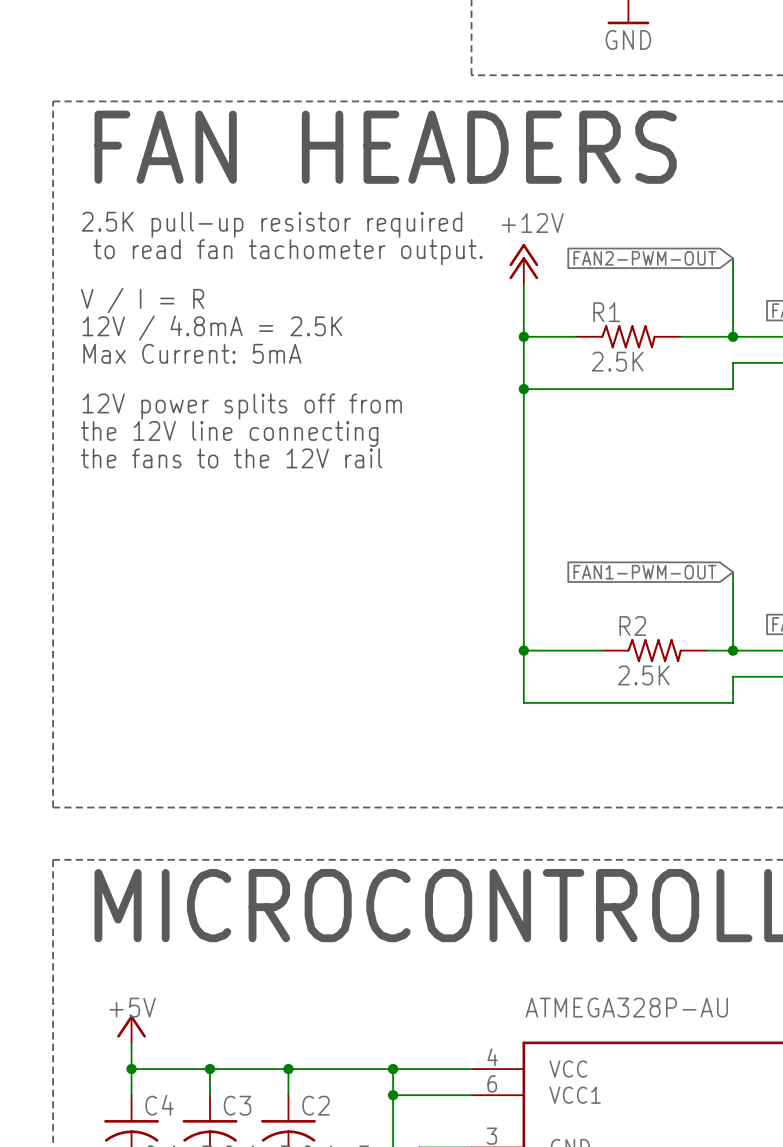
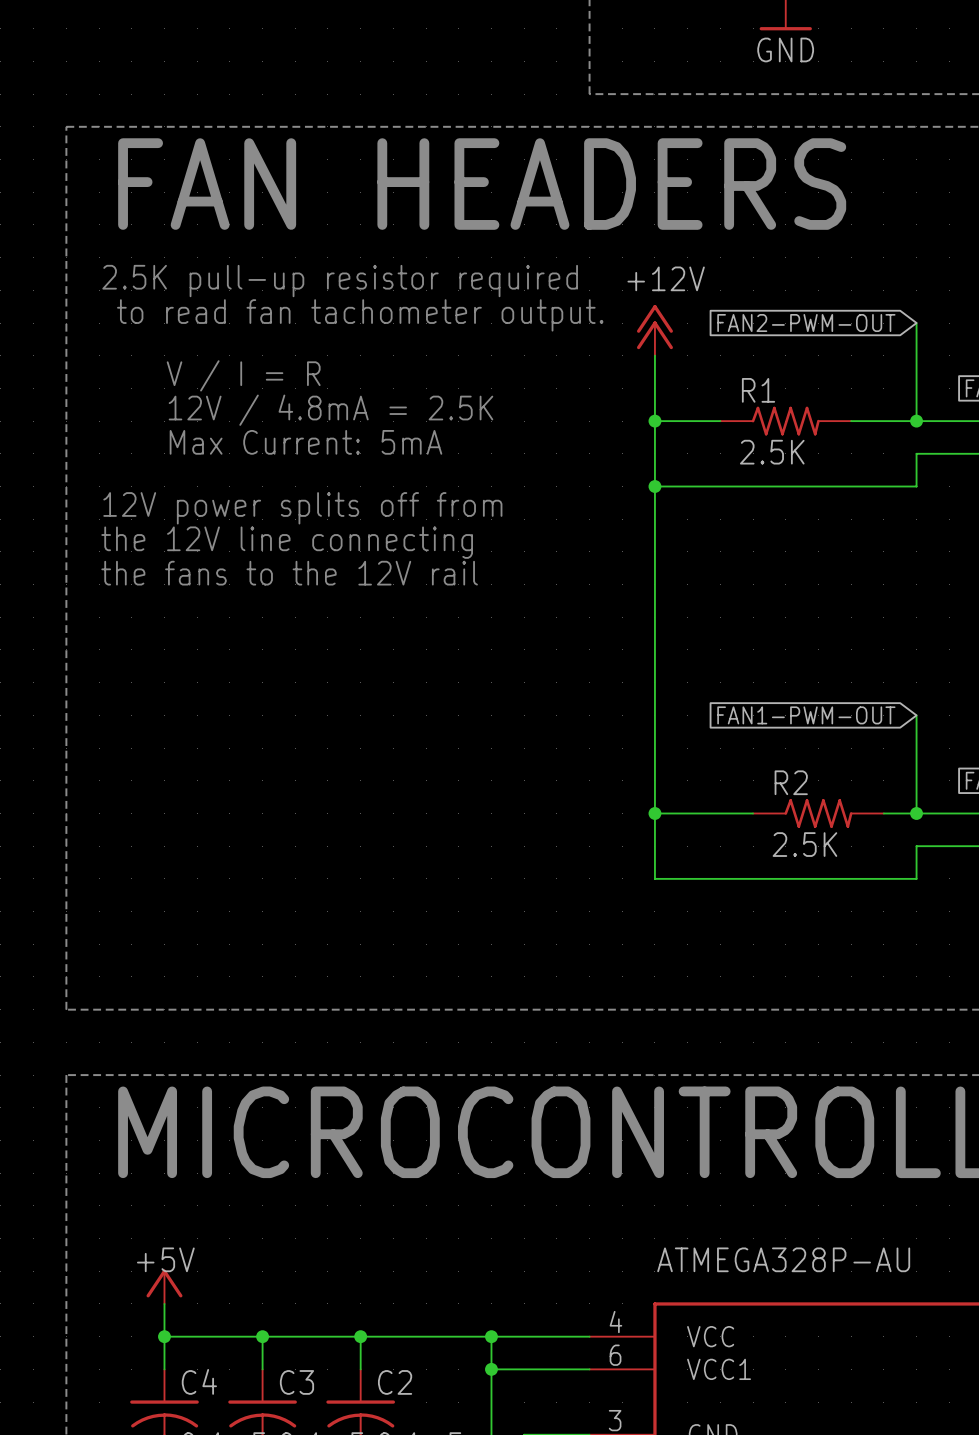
text position: V / I = R (142, 300) -> V / I = R (243, 375)
text position: 12V / 4.8mA = 2.5K (212, 328) -> 12V / 4.8mA = 2.5K (330, 410)
text position: Max Current: 5mA (192, 353) -> Max Current: 5mA (305, 442)

